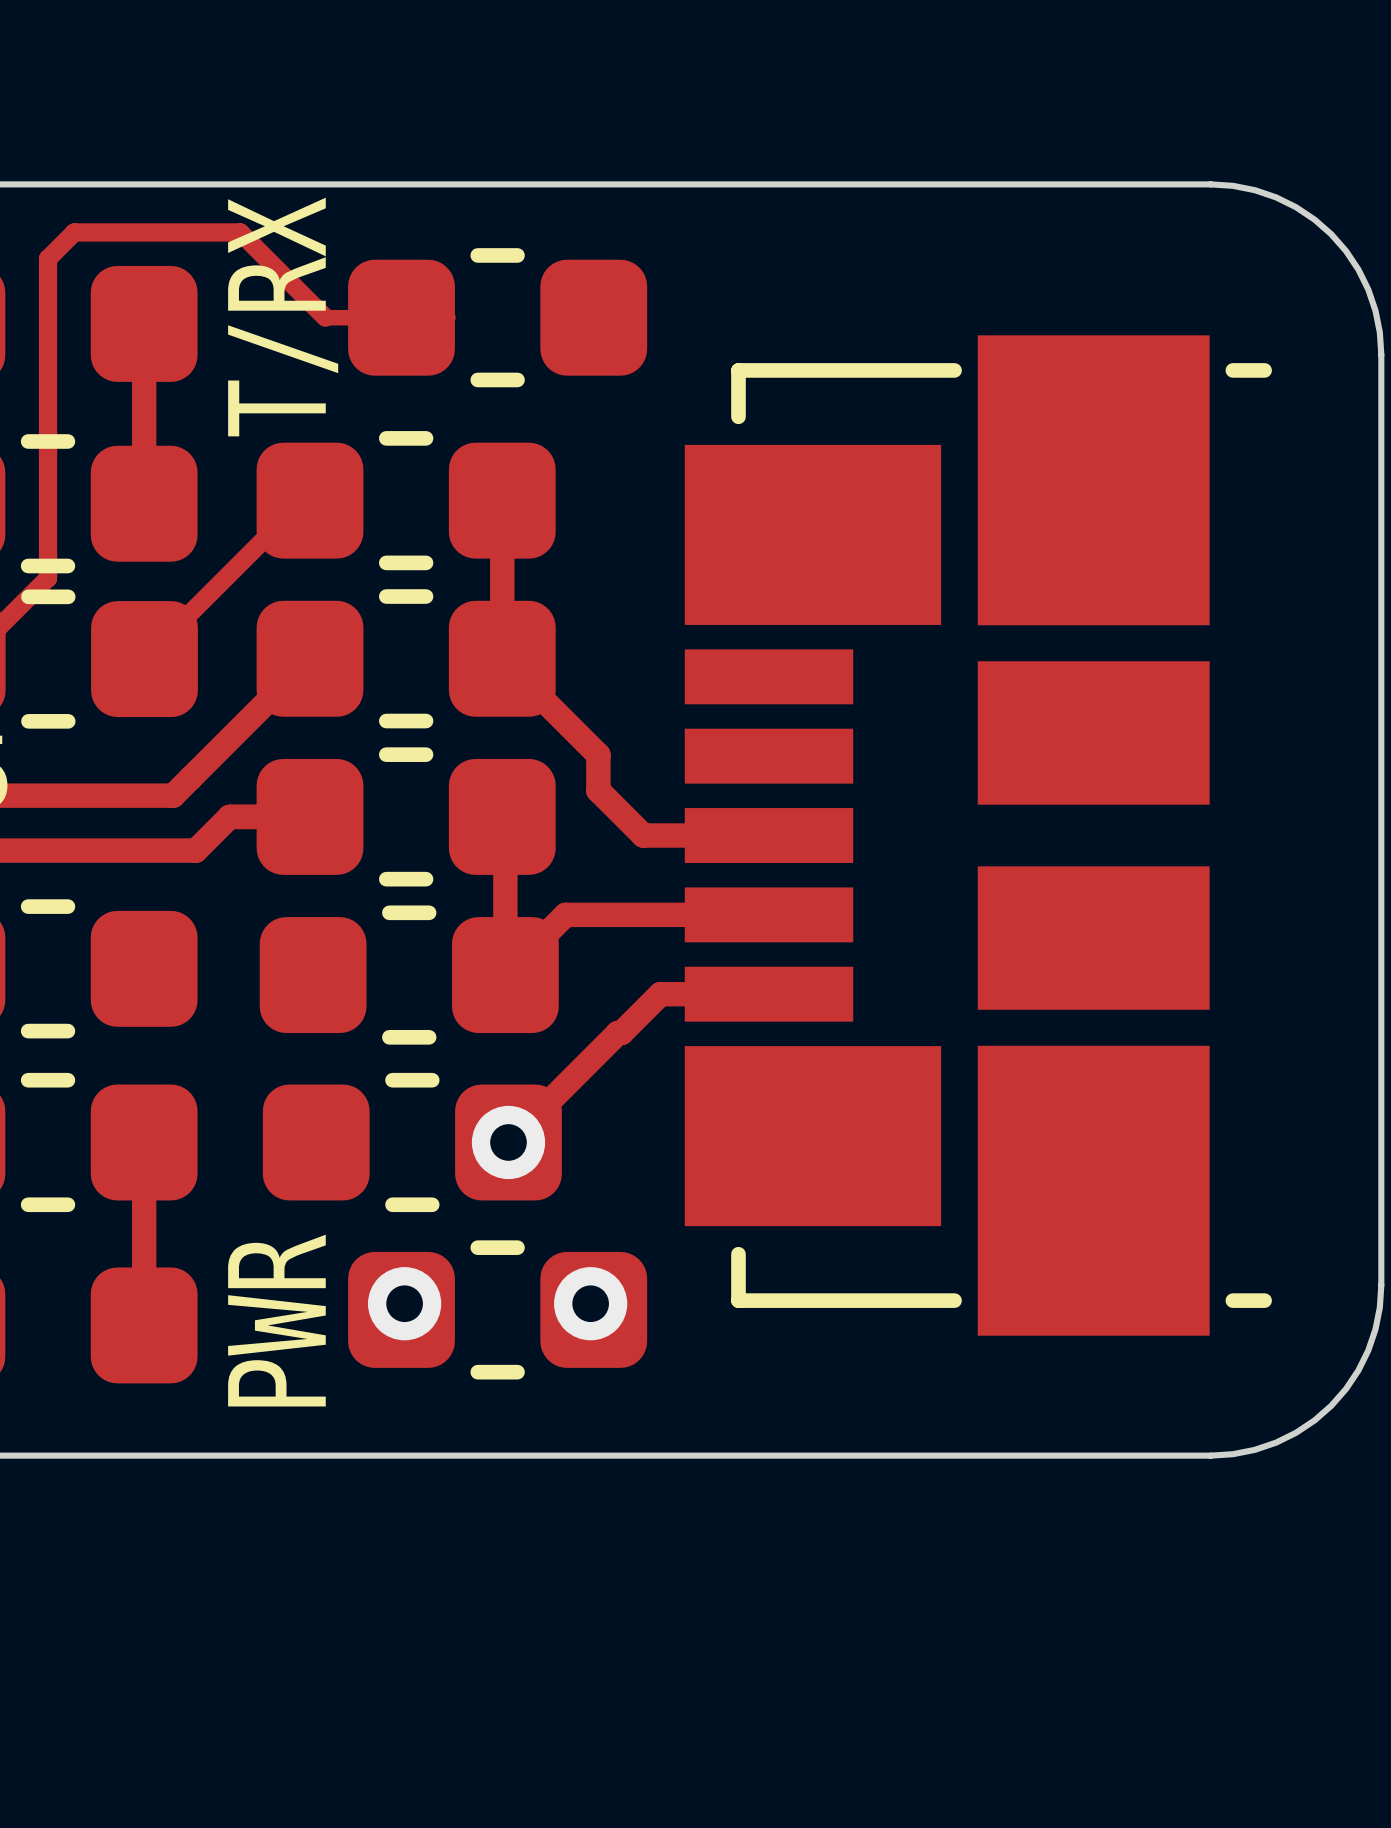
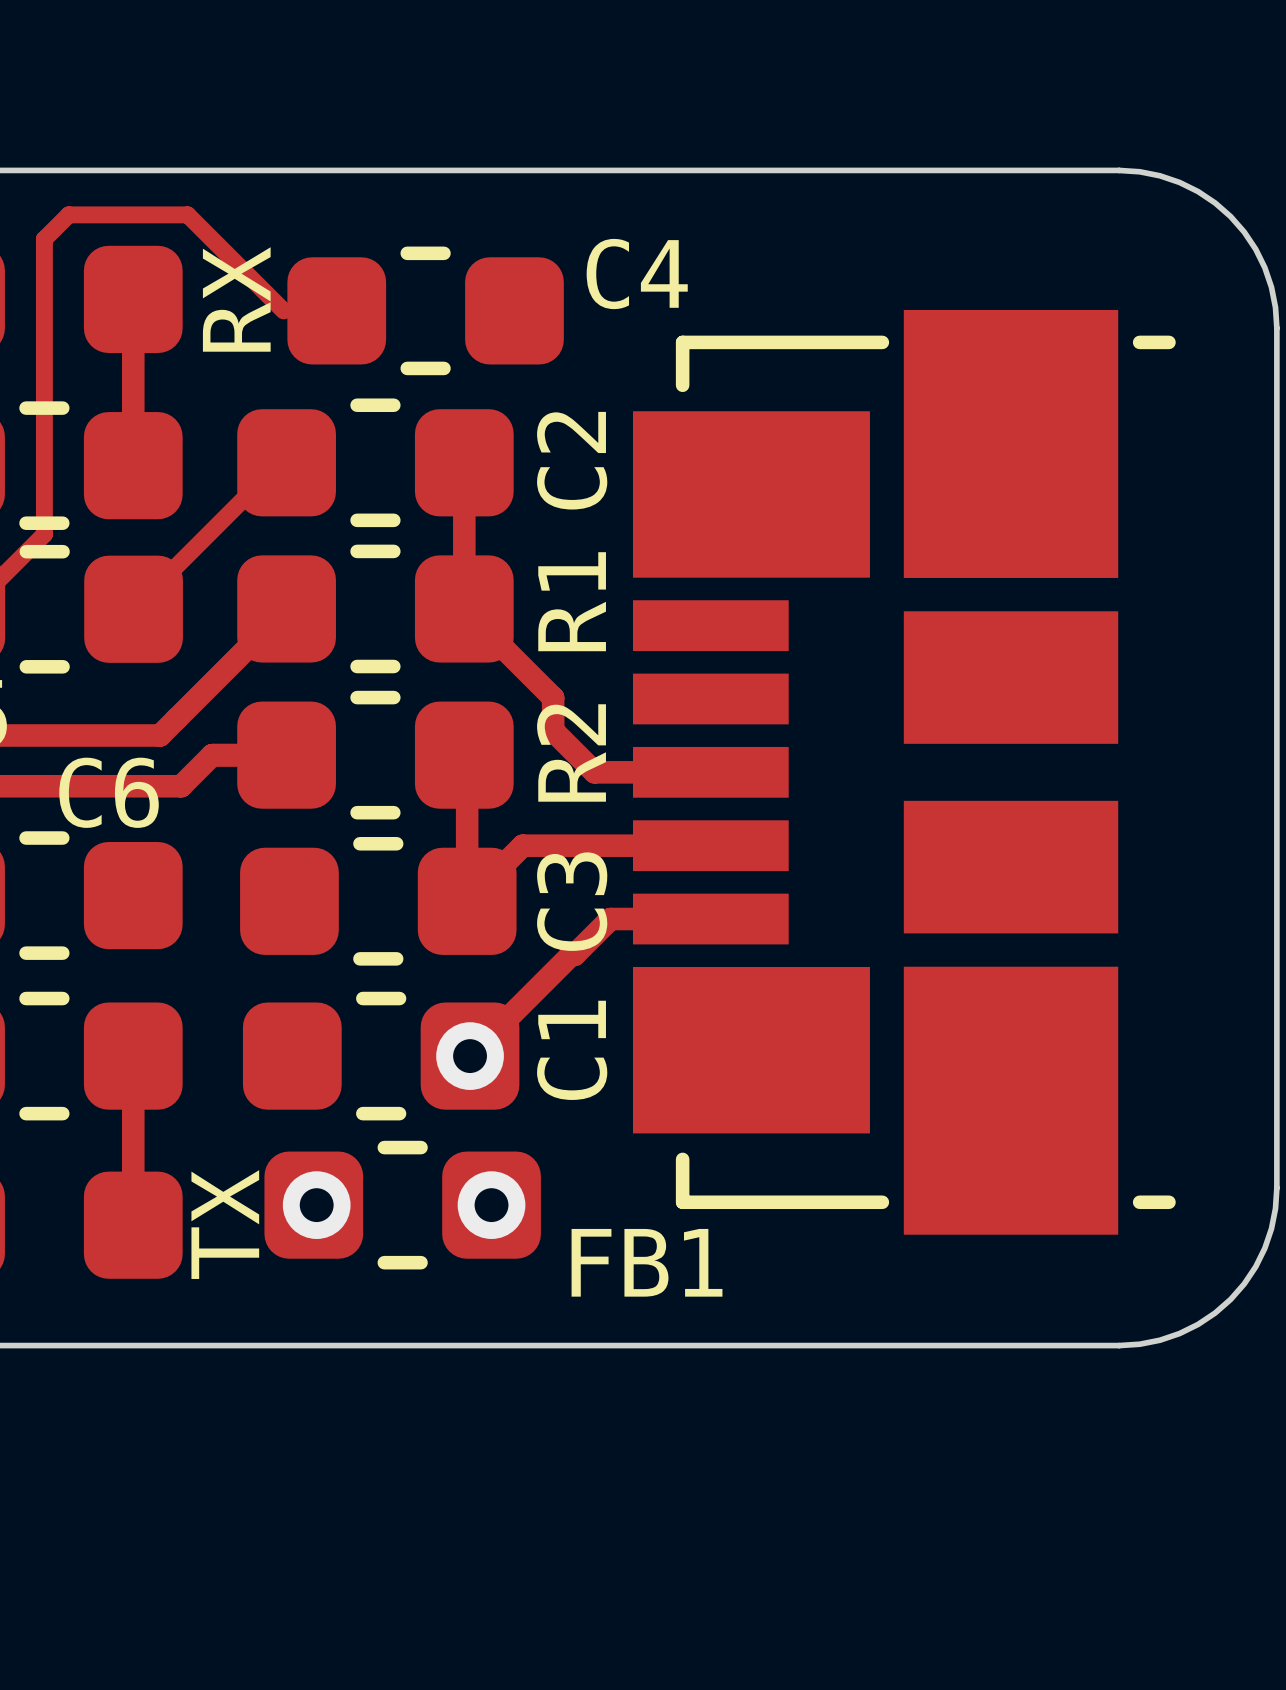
track: (203, 232) (240, 232) (325, 317) (448, 317) -> (187, 214) (283, 310) (336, 310)
C4 name: none -> C4 (637, 274)
T/RX name: T/RX (283, 317) -> RX (236, 299)
C4 position: (497, 317) -> (425, 310)
C2 name: none -> C2 (572, 460)
R1 name: none -> R1 (572, 601)
R2 name: none -> R2 (571, 752)
C6 name: none -> C6 (109, 792)
C3 name: none -> C3 (572, 901)
C1 name: none -> C1 (572, 1050)
via position: (404, 1303) -> (316, 1205)
via position: (590, 1303) -> (491, 1205)
FB1 position: (497, 1309) -> (402, 1205)
PWR name: PWR (276, 1320) -> TX (225, 1224)
FB1 name: none -> FB1 (647, 1262)

